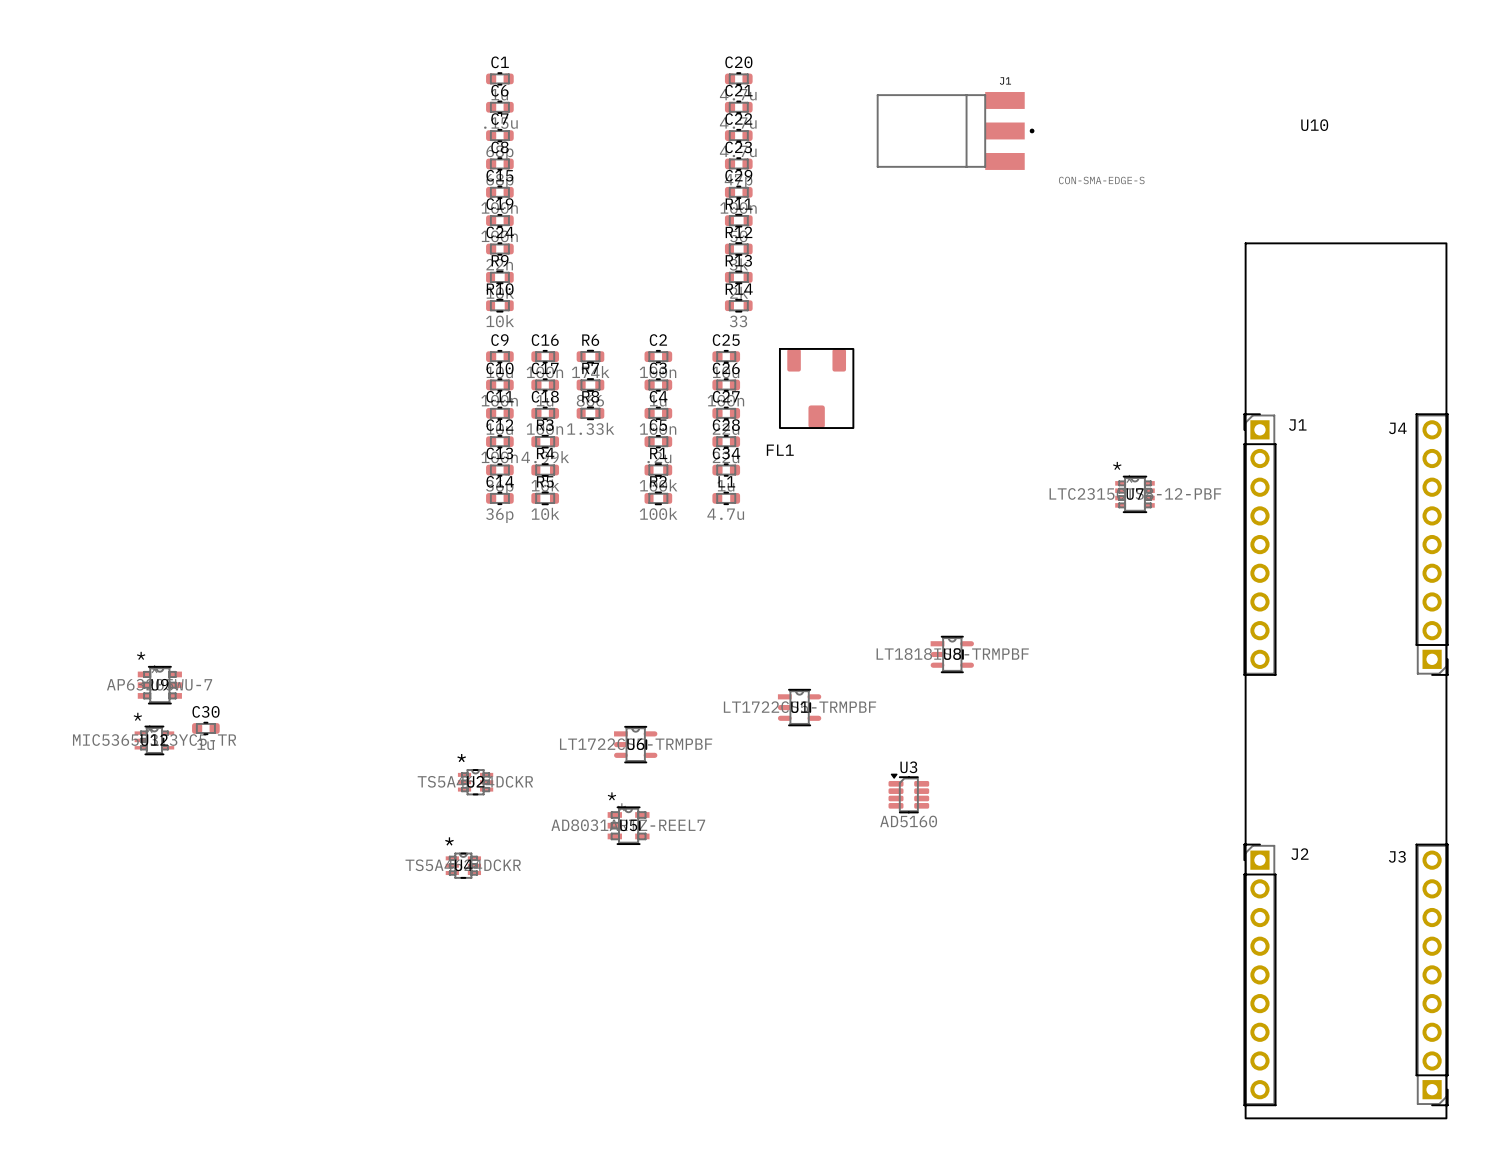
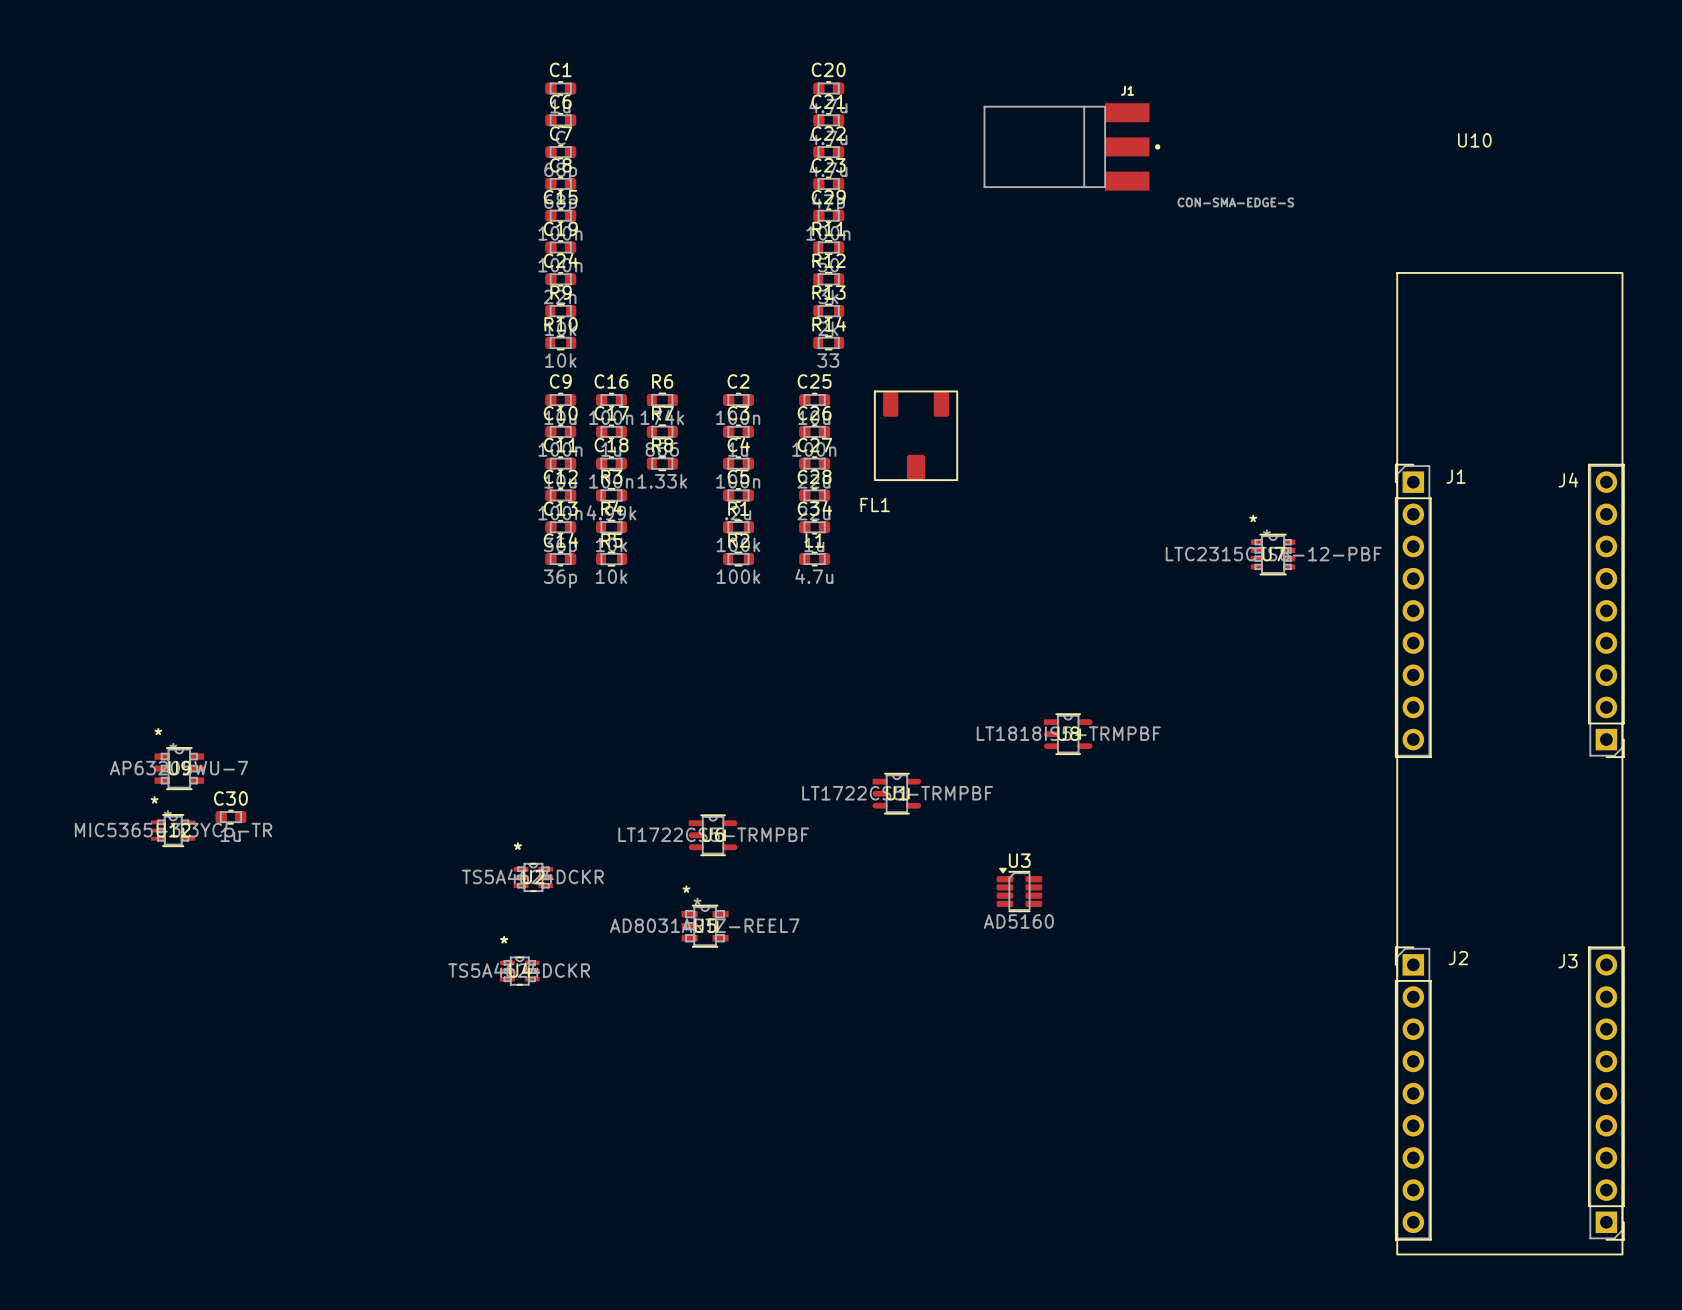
C6 value: .15u (500, 123) -> C (560, 137)

